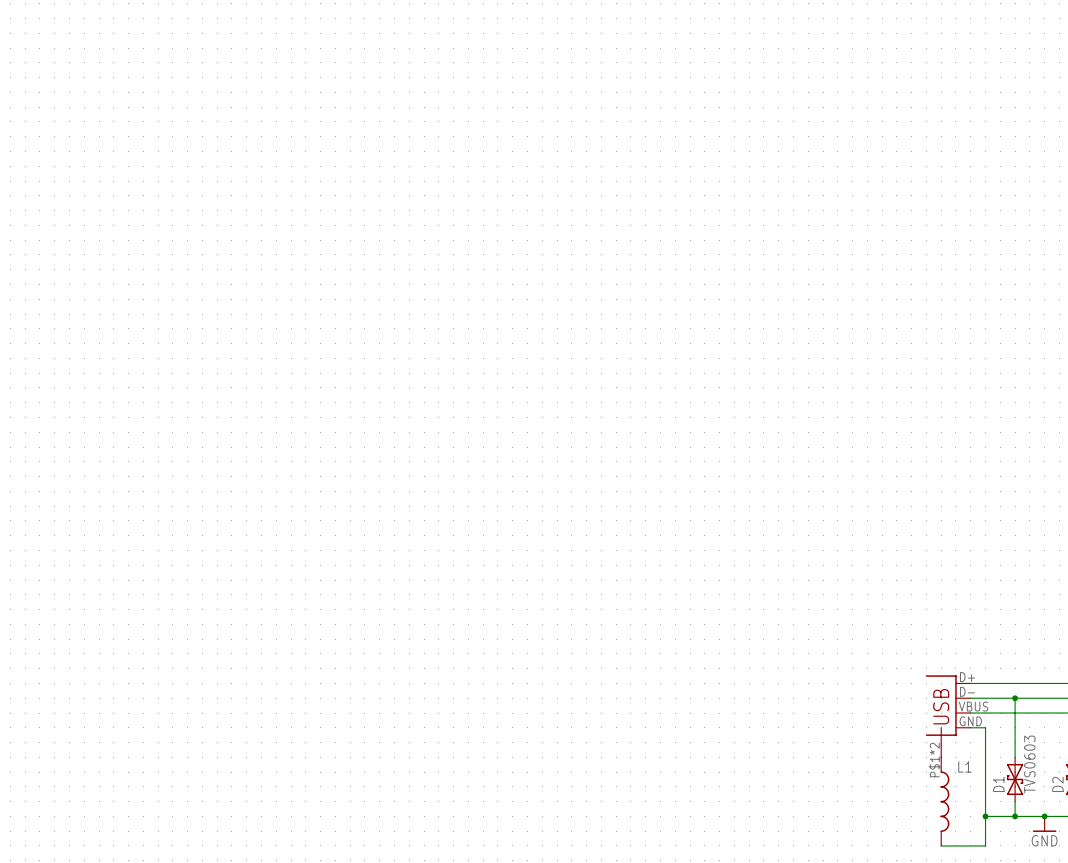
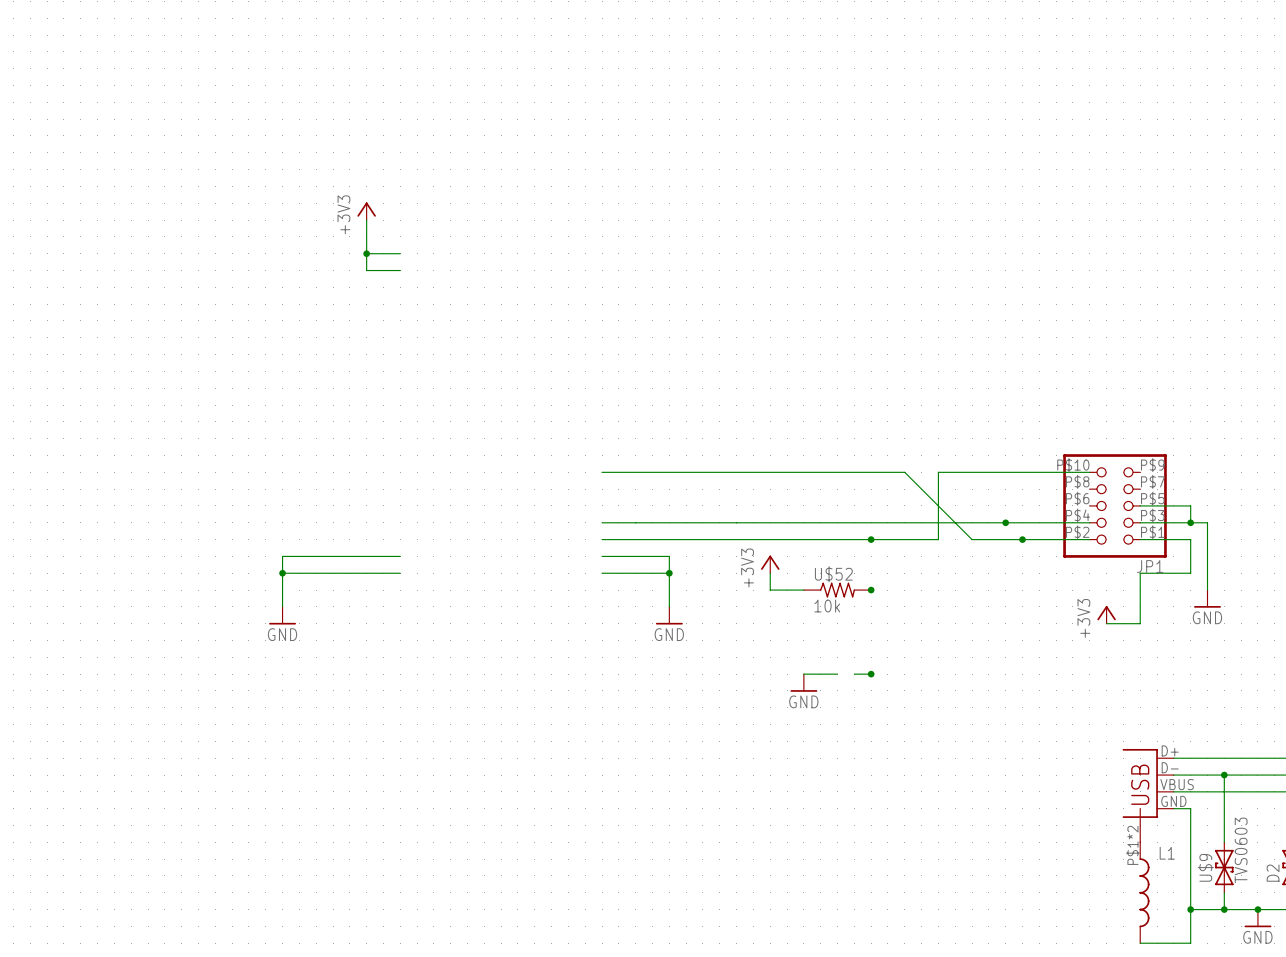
power symbol: none -> +3V3 (366, 211)
wire: none -> (366, 220) (366, 270) (400, 270)
wire: none -> (366, 253) (400, 253)
junction: none -> (366, 253)
wire: none -> (602, 472) (904, 472) (972, 539) (1089, 539)
wire: none -> (1089, 472) (938, 472) (938, 539) (602, 539)
JP1: none -> (1115, 505)
wire: none -> (1140, 505) (1190, 505) (1190, 522)
wire: none -> (602, 522) (1089, 522)
junction: none -> (1005, 522)
wire: none -> (1140, 522) (1207, 522) (1207, 590)
junction: none -> (1190, 522)
junction: none -> (871, 539)
junction: none -> (1022, 539)
wire: none -> (1140, 539) (1190, 539) (1190, 573) (1140, 573) (1140, 623) (1106, 623)
wire: none -> (400, 556) (282, 556) (282, 606)
wire: none -> (602, 556) (669, 556) (669, 606)
power symbol: none -> +3V3 (770, 564)
wire: none -> (282, 573) (400, 573)
junction: none -> (282, 573)
wire: none -> (602, 573) (669, 573)
junction: none -> (669, 573)
wire: none -> (770, 573) (770, 590) (803, 590)
U$52: none -> 10k (837, 590)
junction: none -> (871, 590)
power symbol: none -> GND (1207, 598)
power symbol: none -> +3V3 (1106, 614)
power symbol: none -> GND (282, 615)
power symbol: none -> GND (669, 615)
wire: none -> (803, 674) (837, 674)
wire: none -> (854, 674) (871, 674)
junction: none -> (871, 674)
power symbol: none -> GND (803, 682)
D1 name: D1 (998, 784) -> U$9 (1205, 867)

